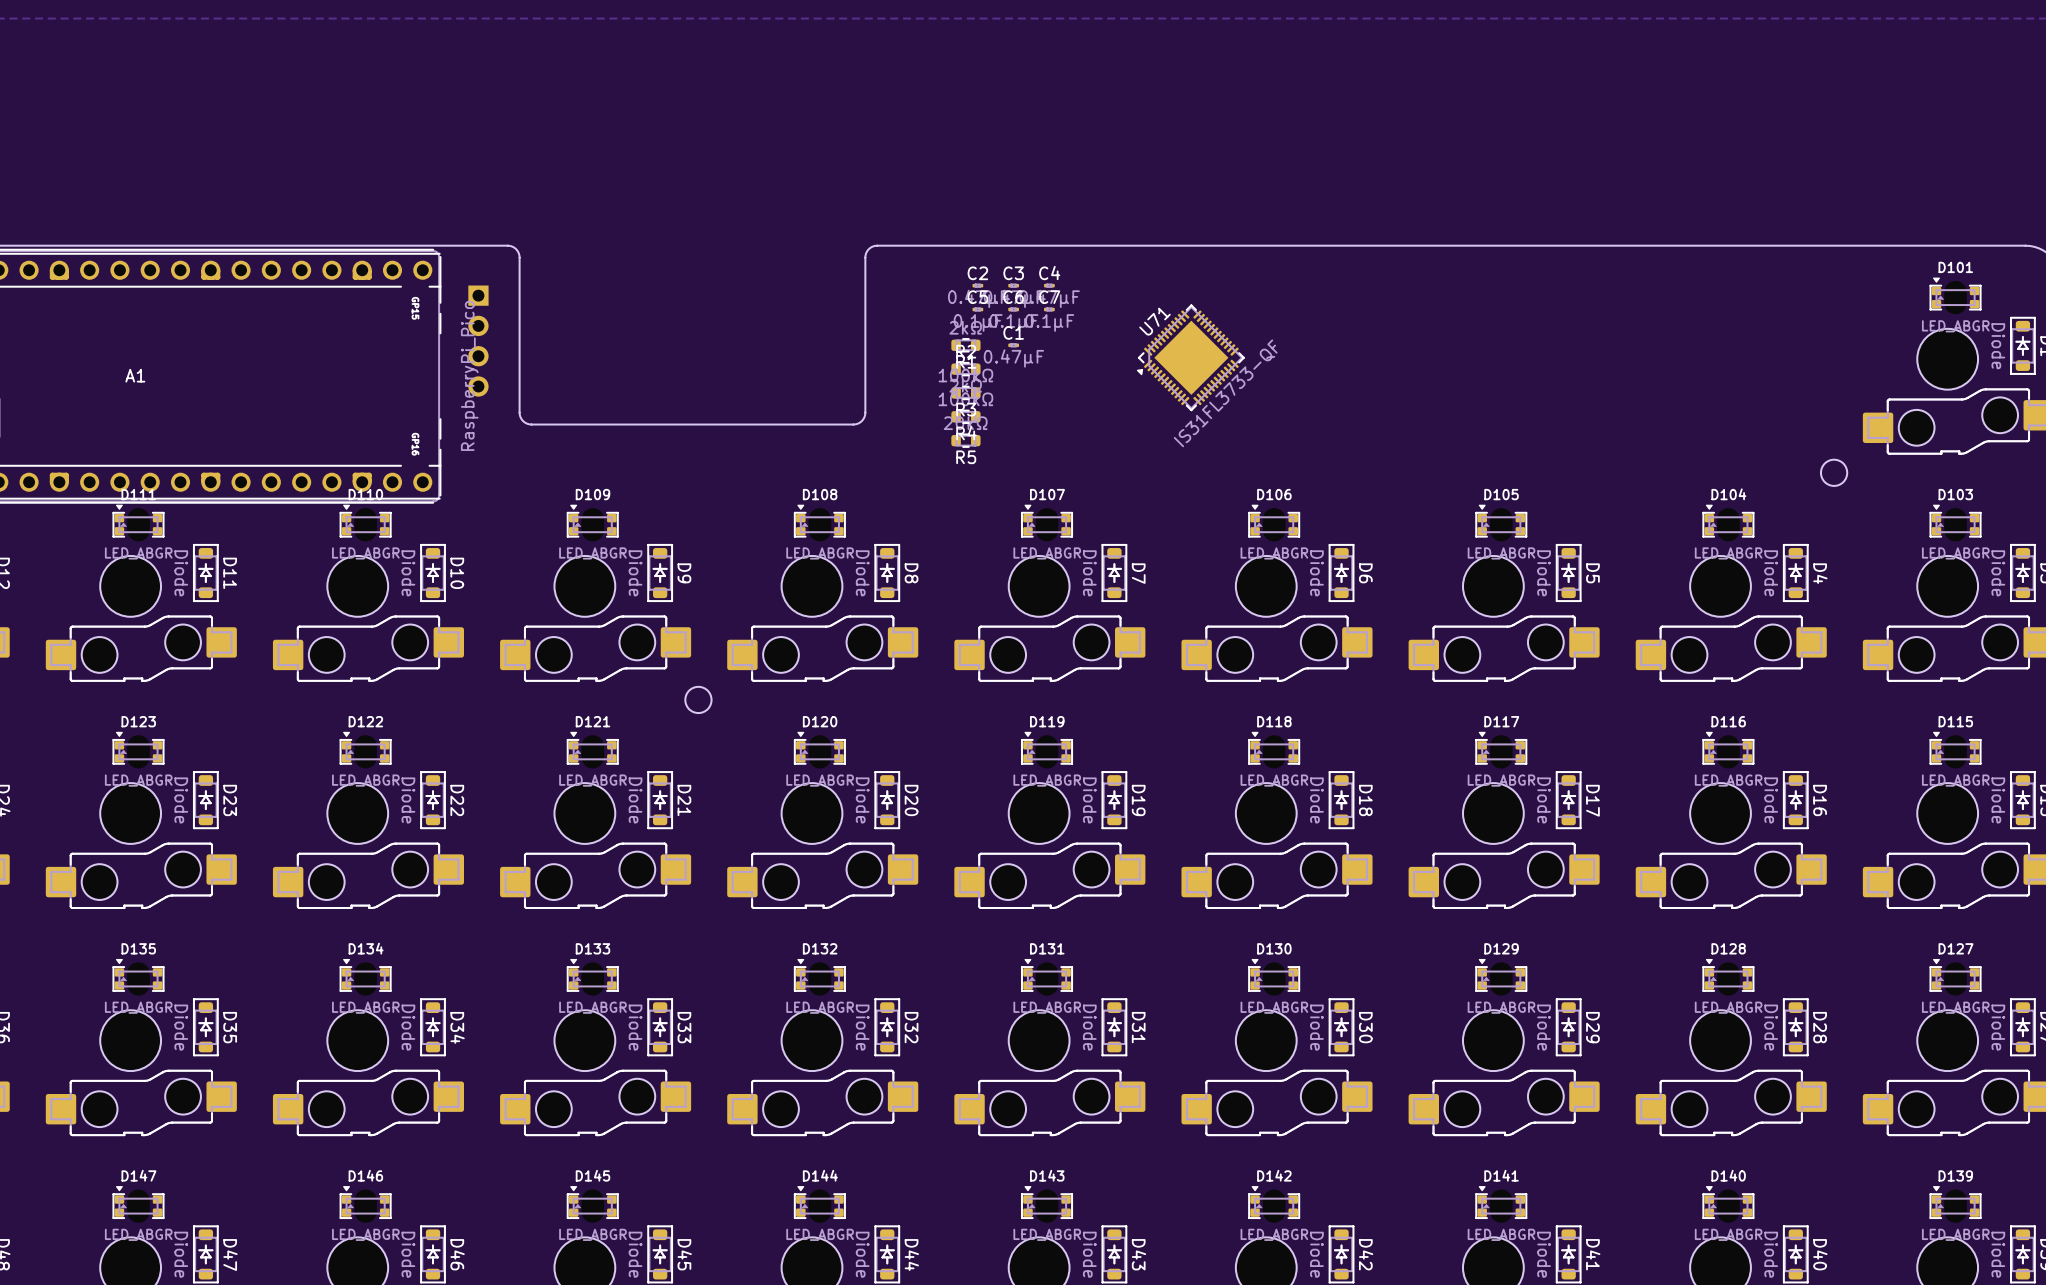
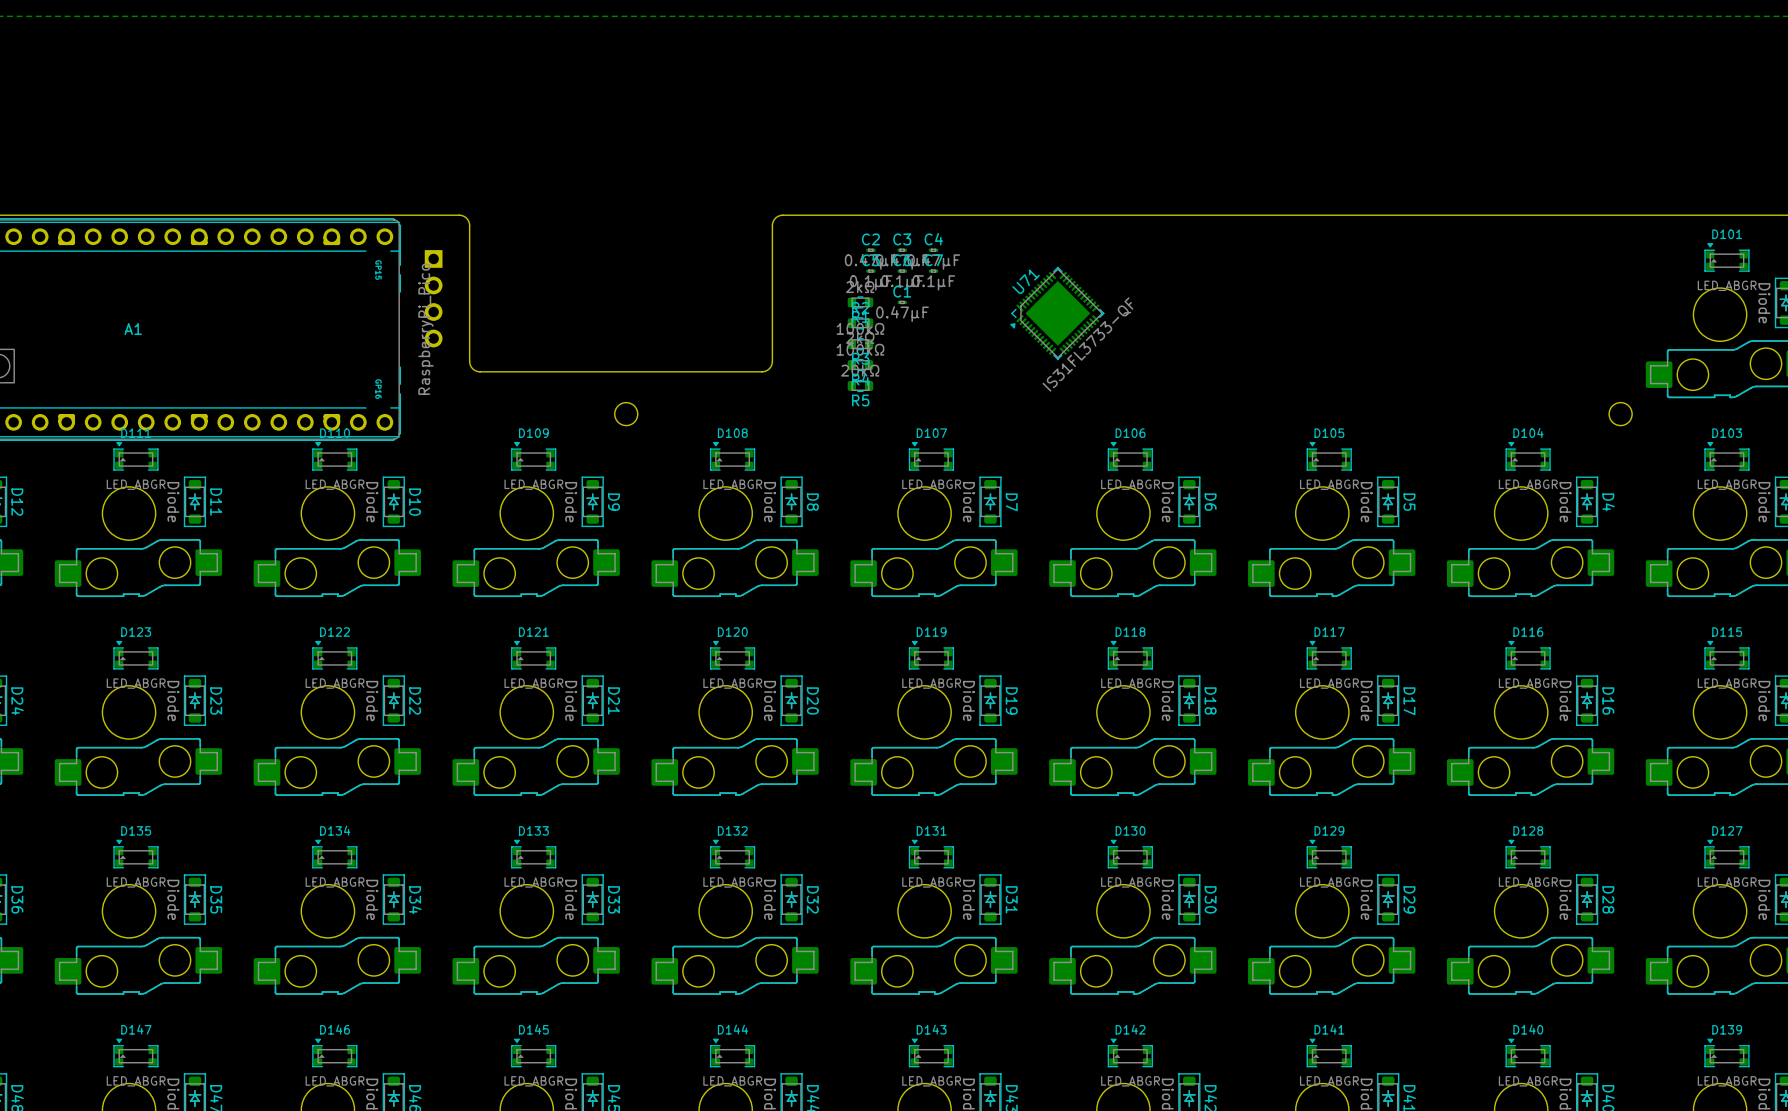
round board edge position: (698, 699) -> (626, 414)

